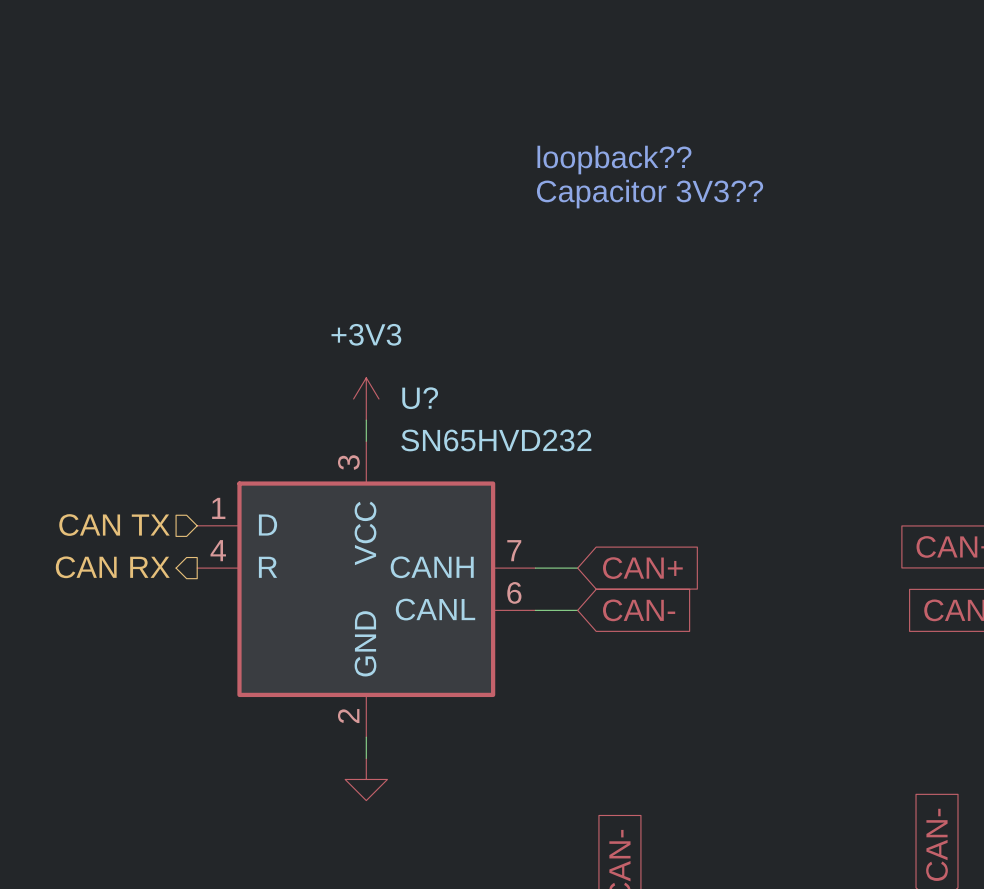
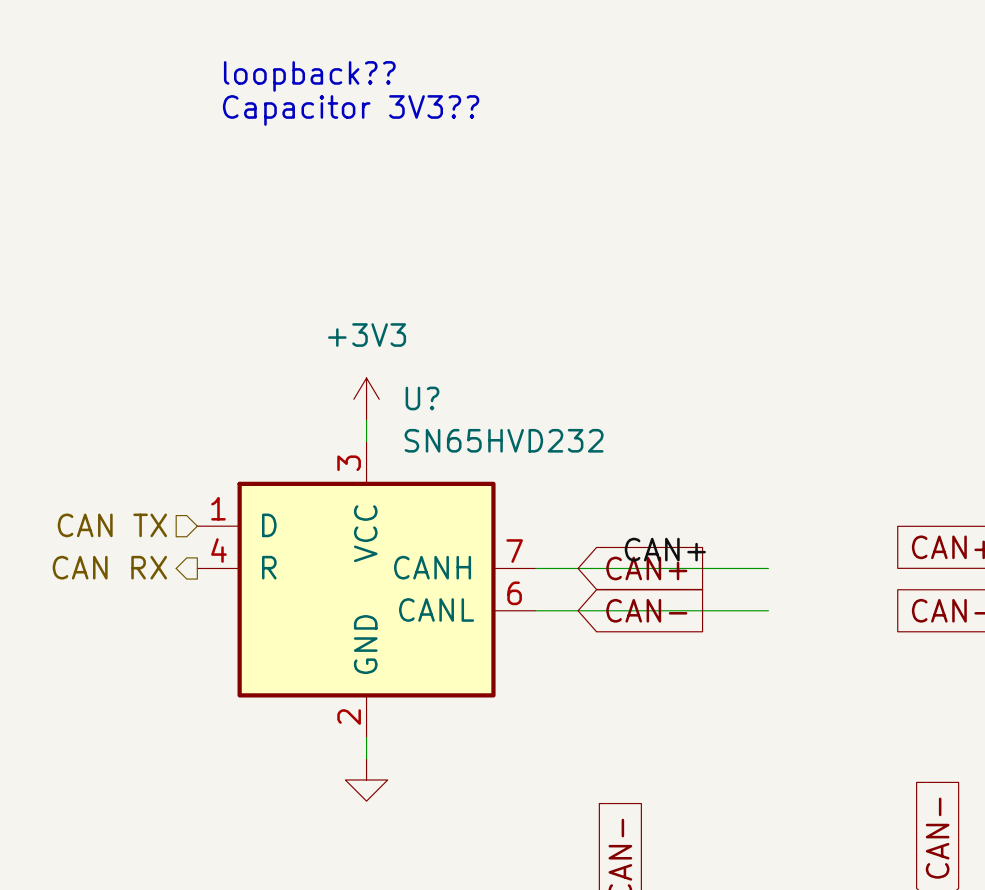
text position: loopback?? (614, 160) -> loopback?? (309, 76)
text position: Capacitor 3V3?? (650, 194) -> Capacitor 3V3?? (351, 110)
label: none -> CAN+ (665, 549)
wire: none -> (578, 568) (768, 568)
wire: none -> (578, 610) (768, 610)

